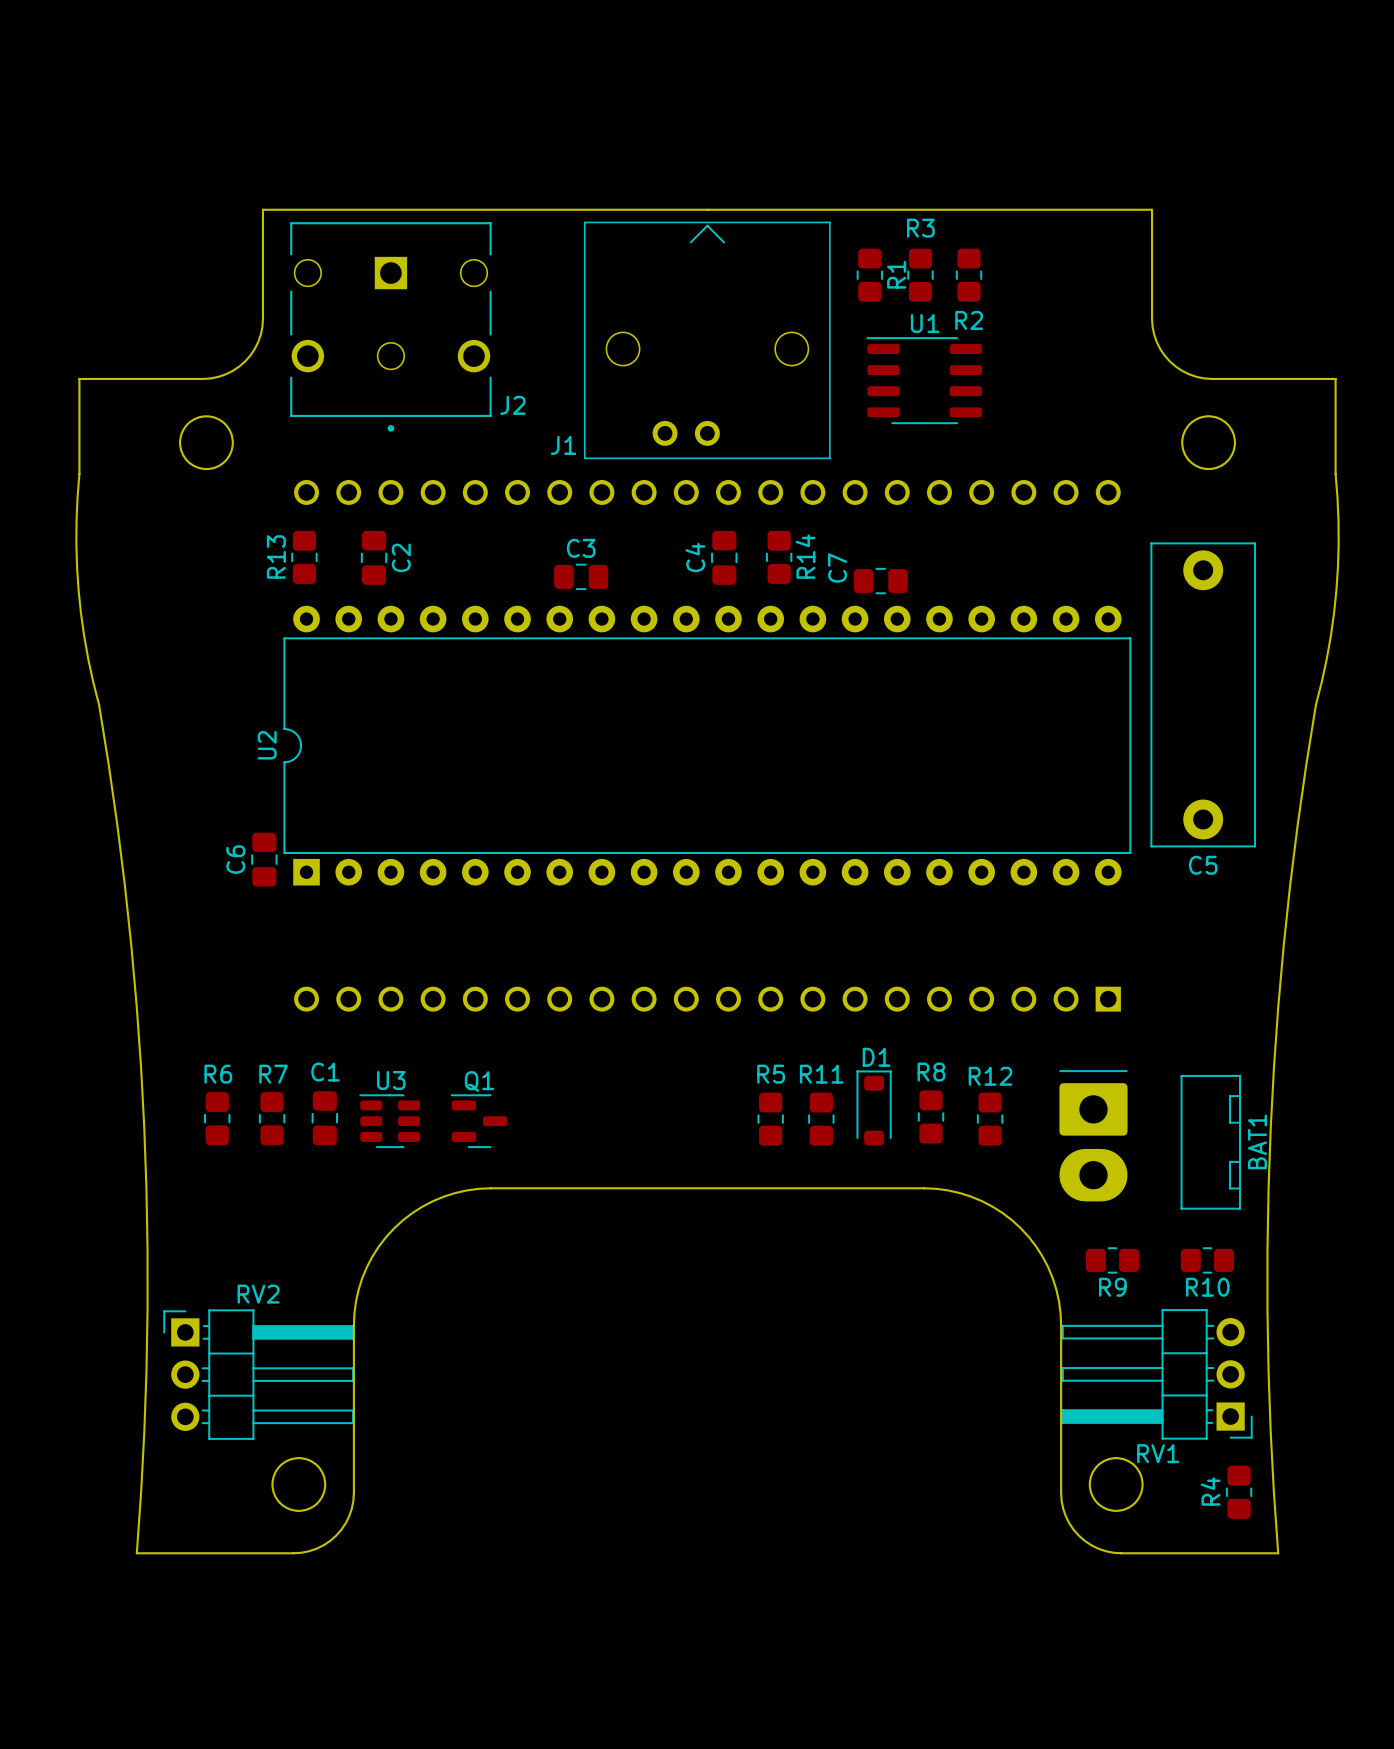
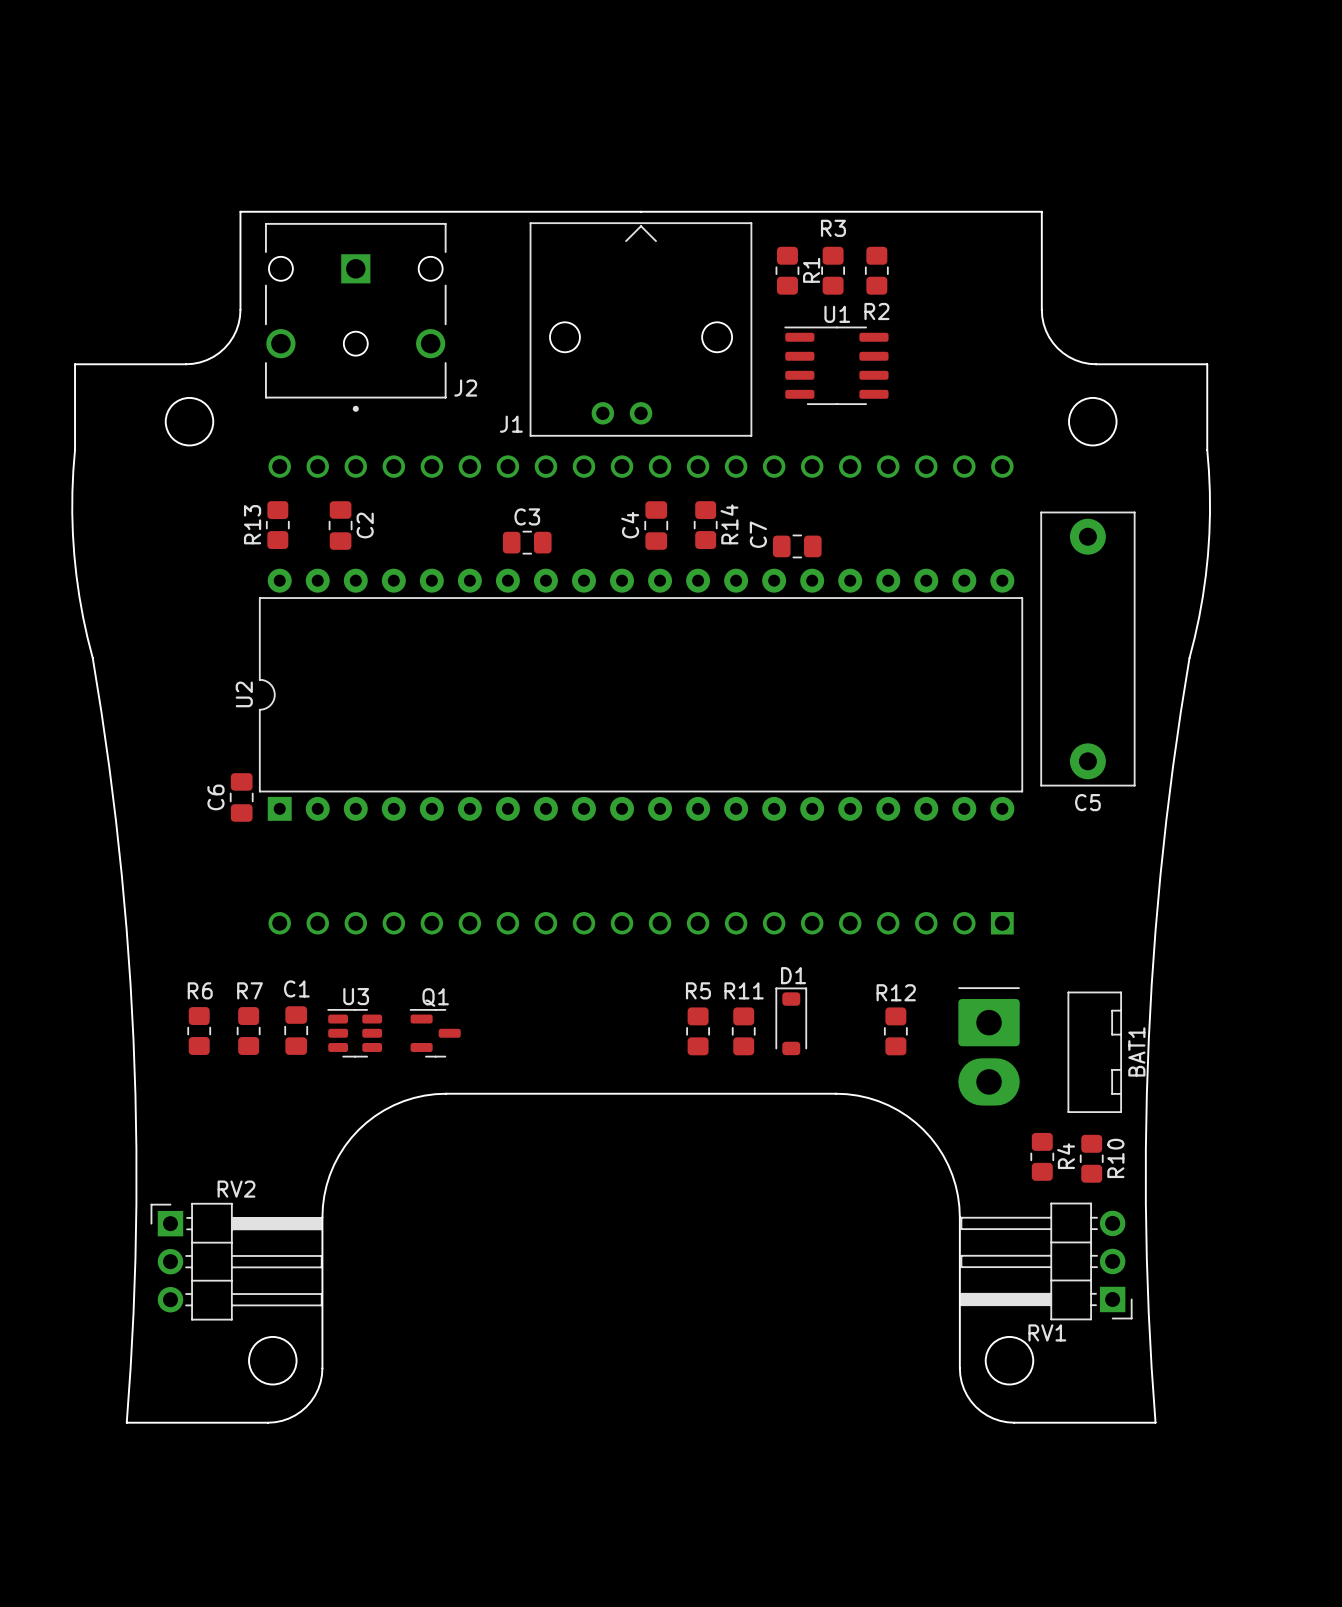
R8: (931, 1116) -> none
R9: (1112, 1260) -> none
R10 rotation: 0° (1207, 1260) -> 90° clockwise (1091, 1158)
R10 name position: R10 (1207, 1287) -> R10 (1115, 1158)
R4 name position: R4 (1210, 1491) -> R4 (1066, 1156)
R4 position: (1239, 1492) -> (1042, 1156)

